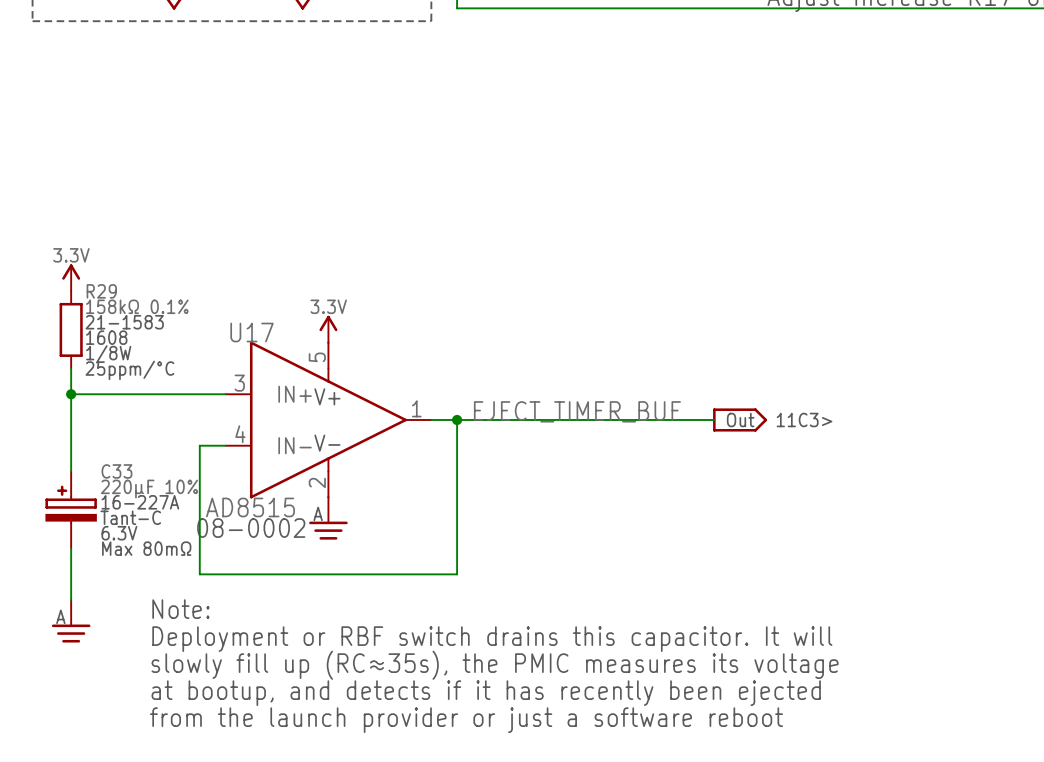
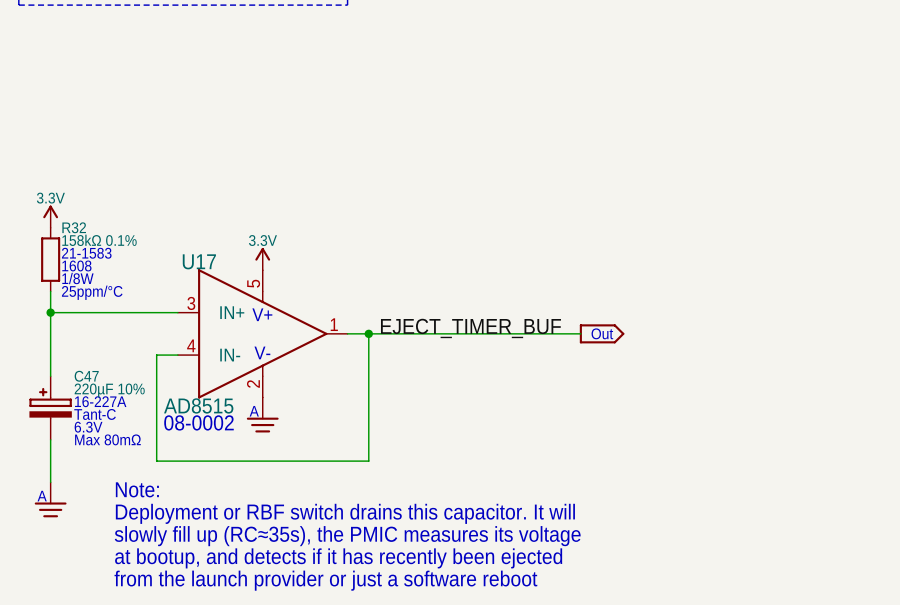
R29 name: R29 (101, 291) -> R32 (74, 227)
text: 11C3> (804, 419) -> none
C33 name: C33 (116, 471) -> C47 (86, 376)

